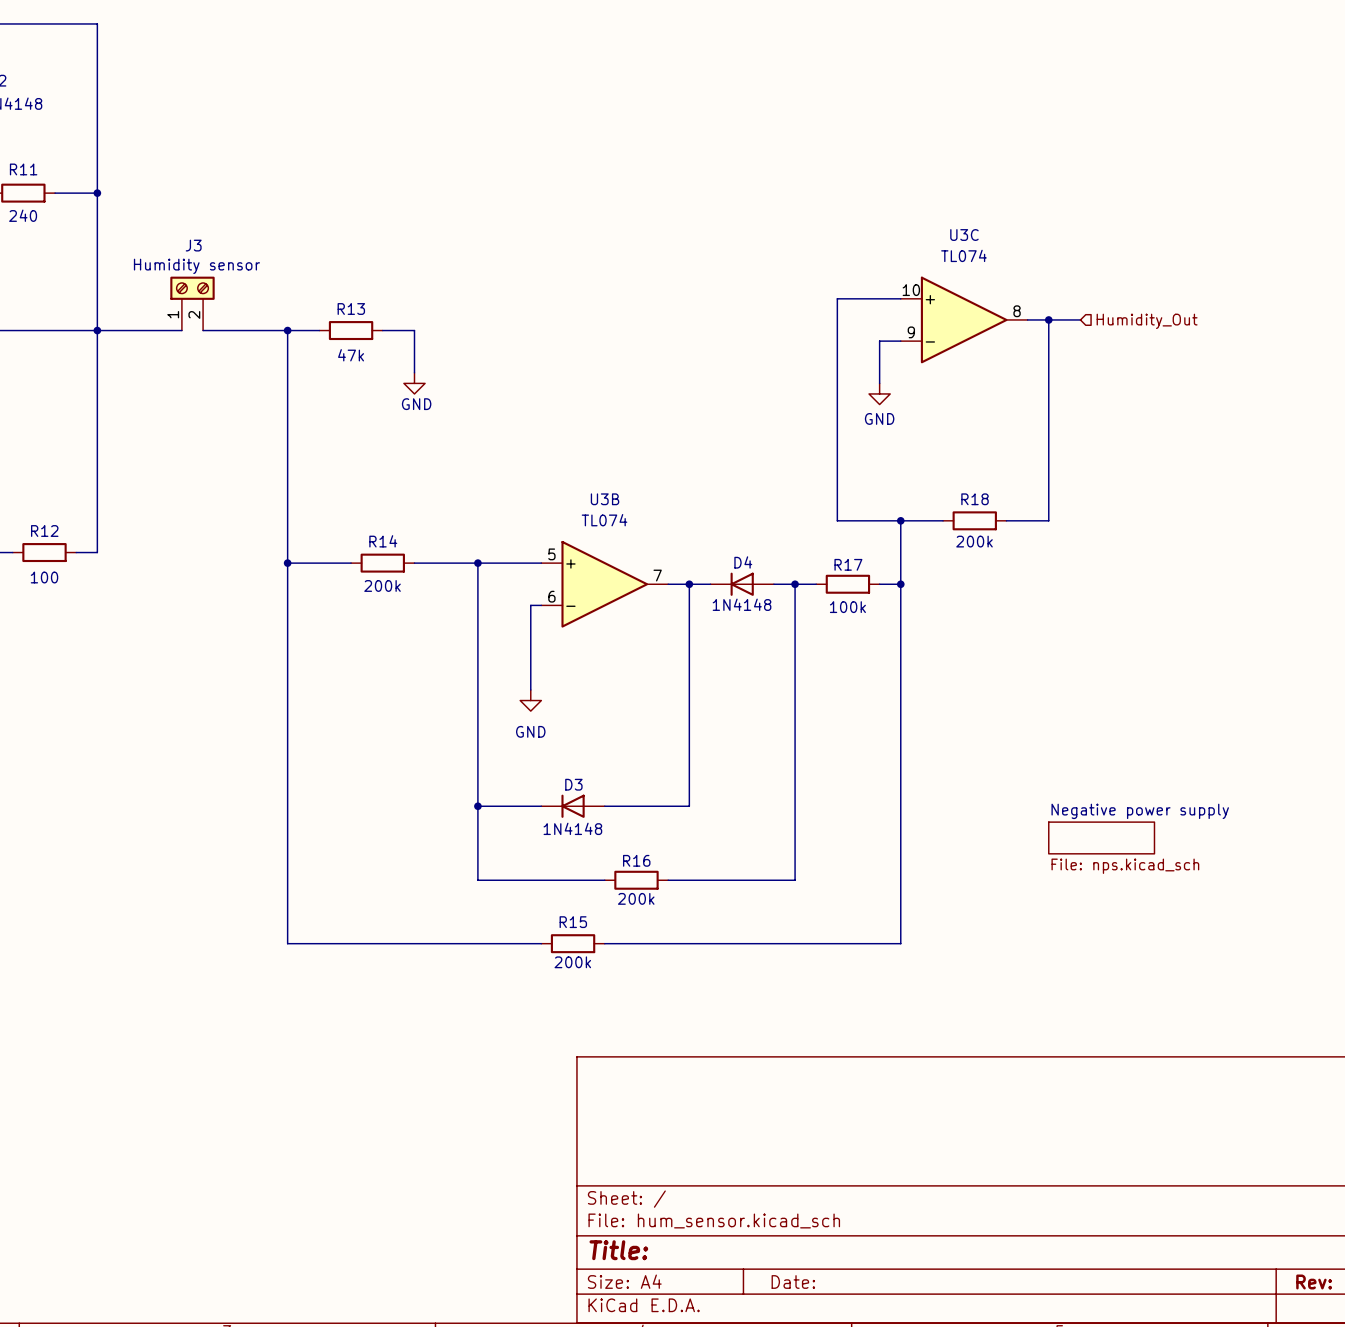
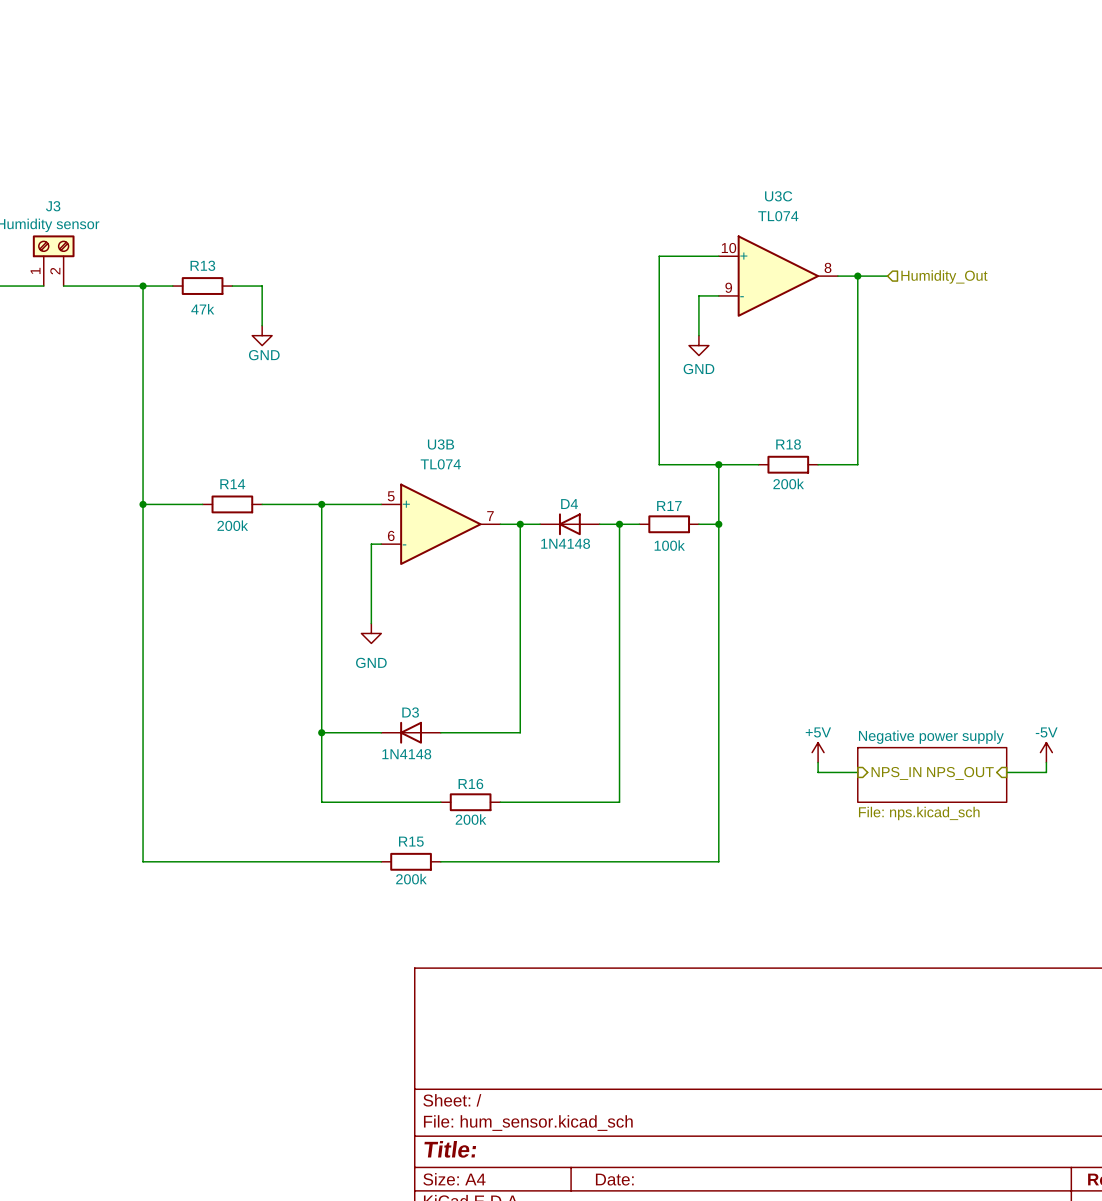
power symbol: none -> +5V (818, 752)
power symbol: none -> -5V (1046, 752)
wire: none -> (818, 762) (818, 772) (857, 772)
sheet Negative power supply: File: nps.kicad_sch (1101, 837) -> none
wire: none -> (1046, 762) (1046, 772) (1006, 772)
hierarchical label: none -> NPS_IN (896, 773)
hierarchical label: none -> NPS_OUT (960, 773)
sheet Negative power supply: none -> File: nps.kicad_sch (932, 774)

